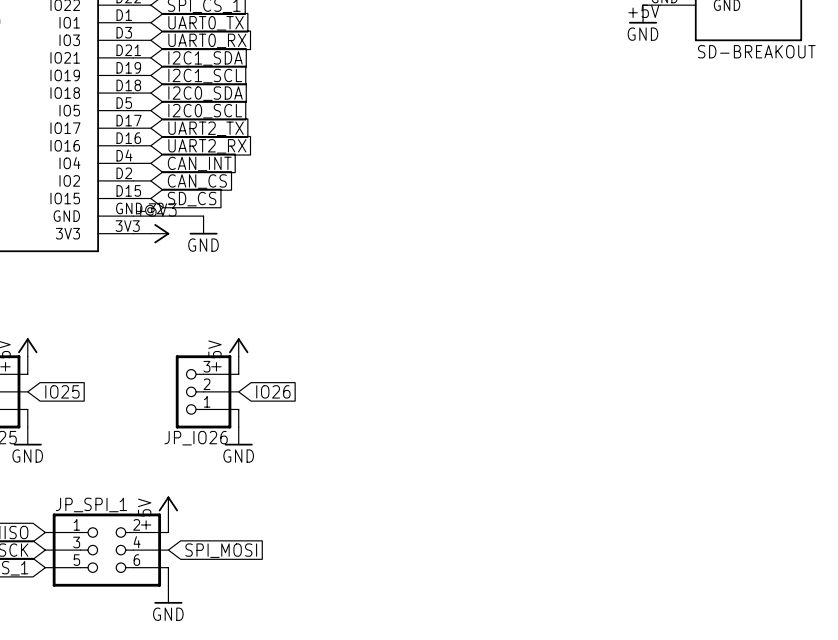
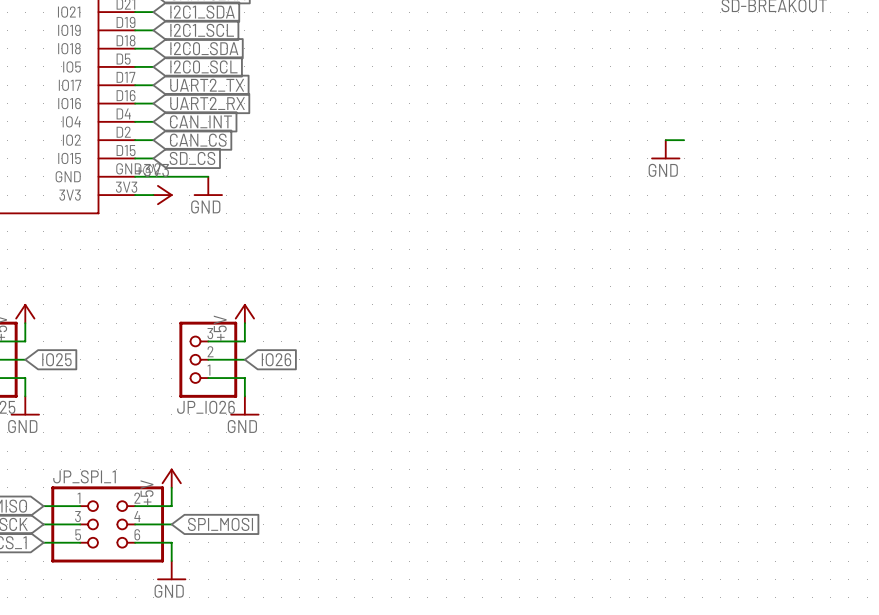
wire: none -> (665, 140) (684, 140)
power symbol: none -> GND (665, 149)

